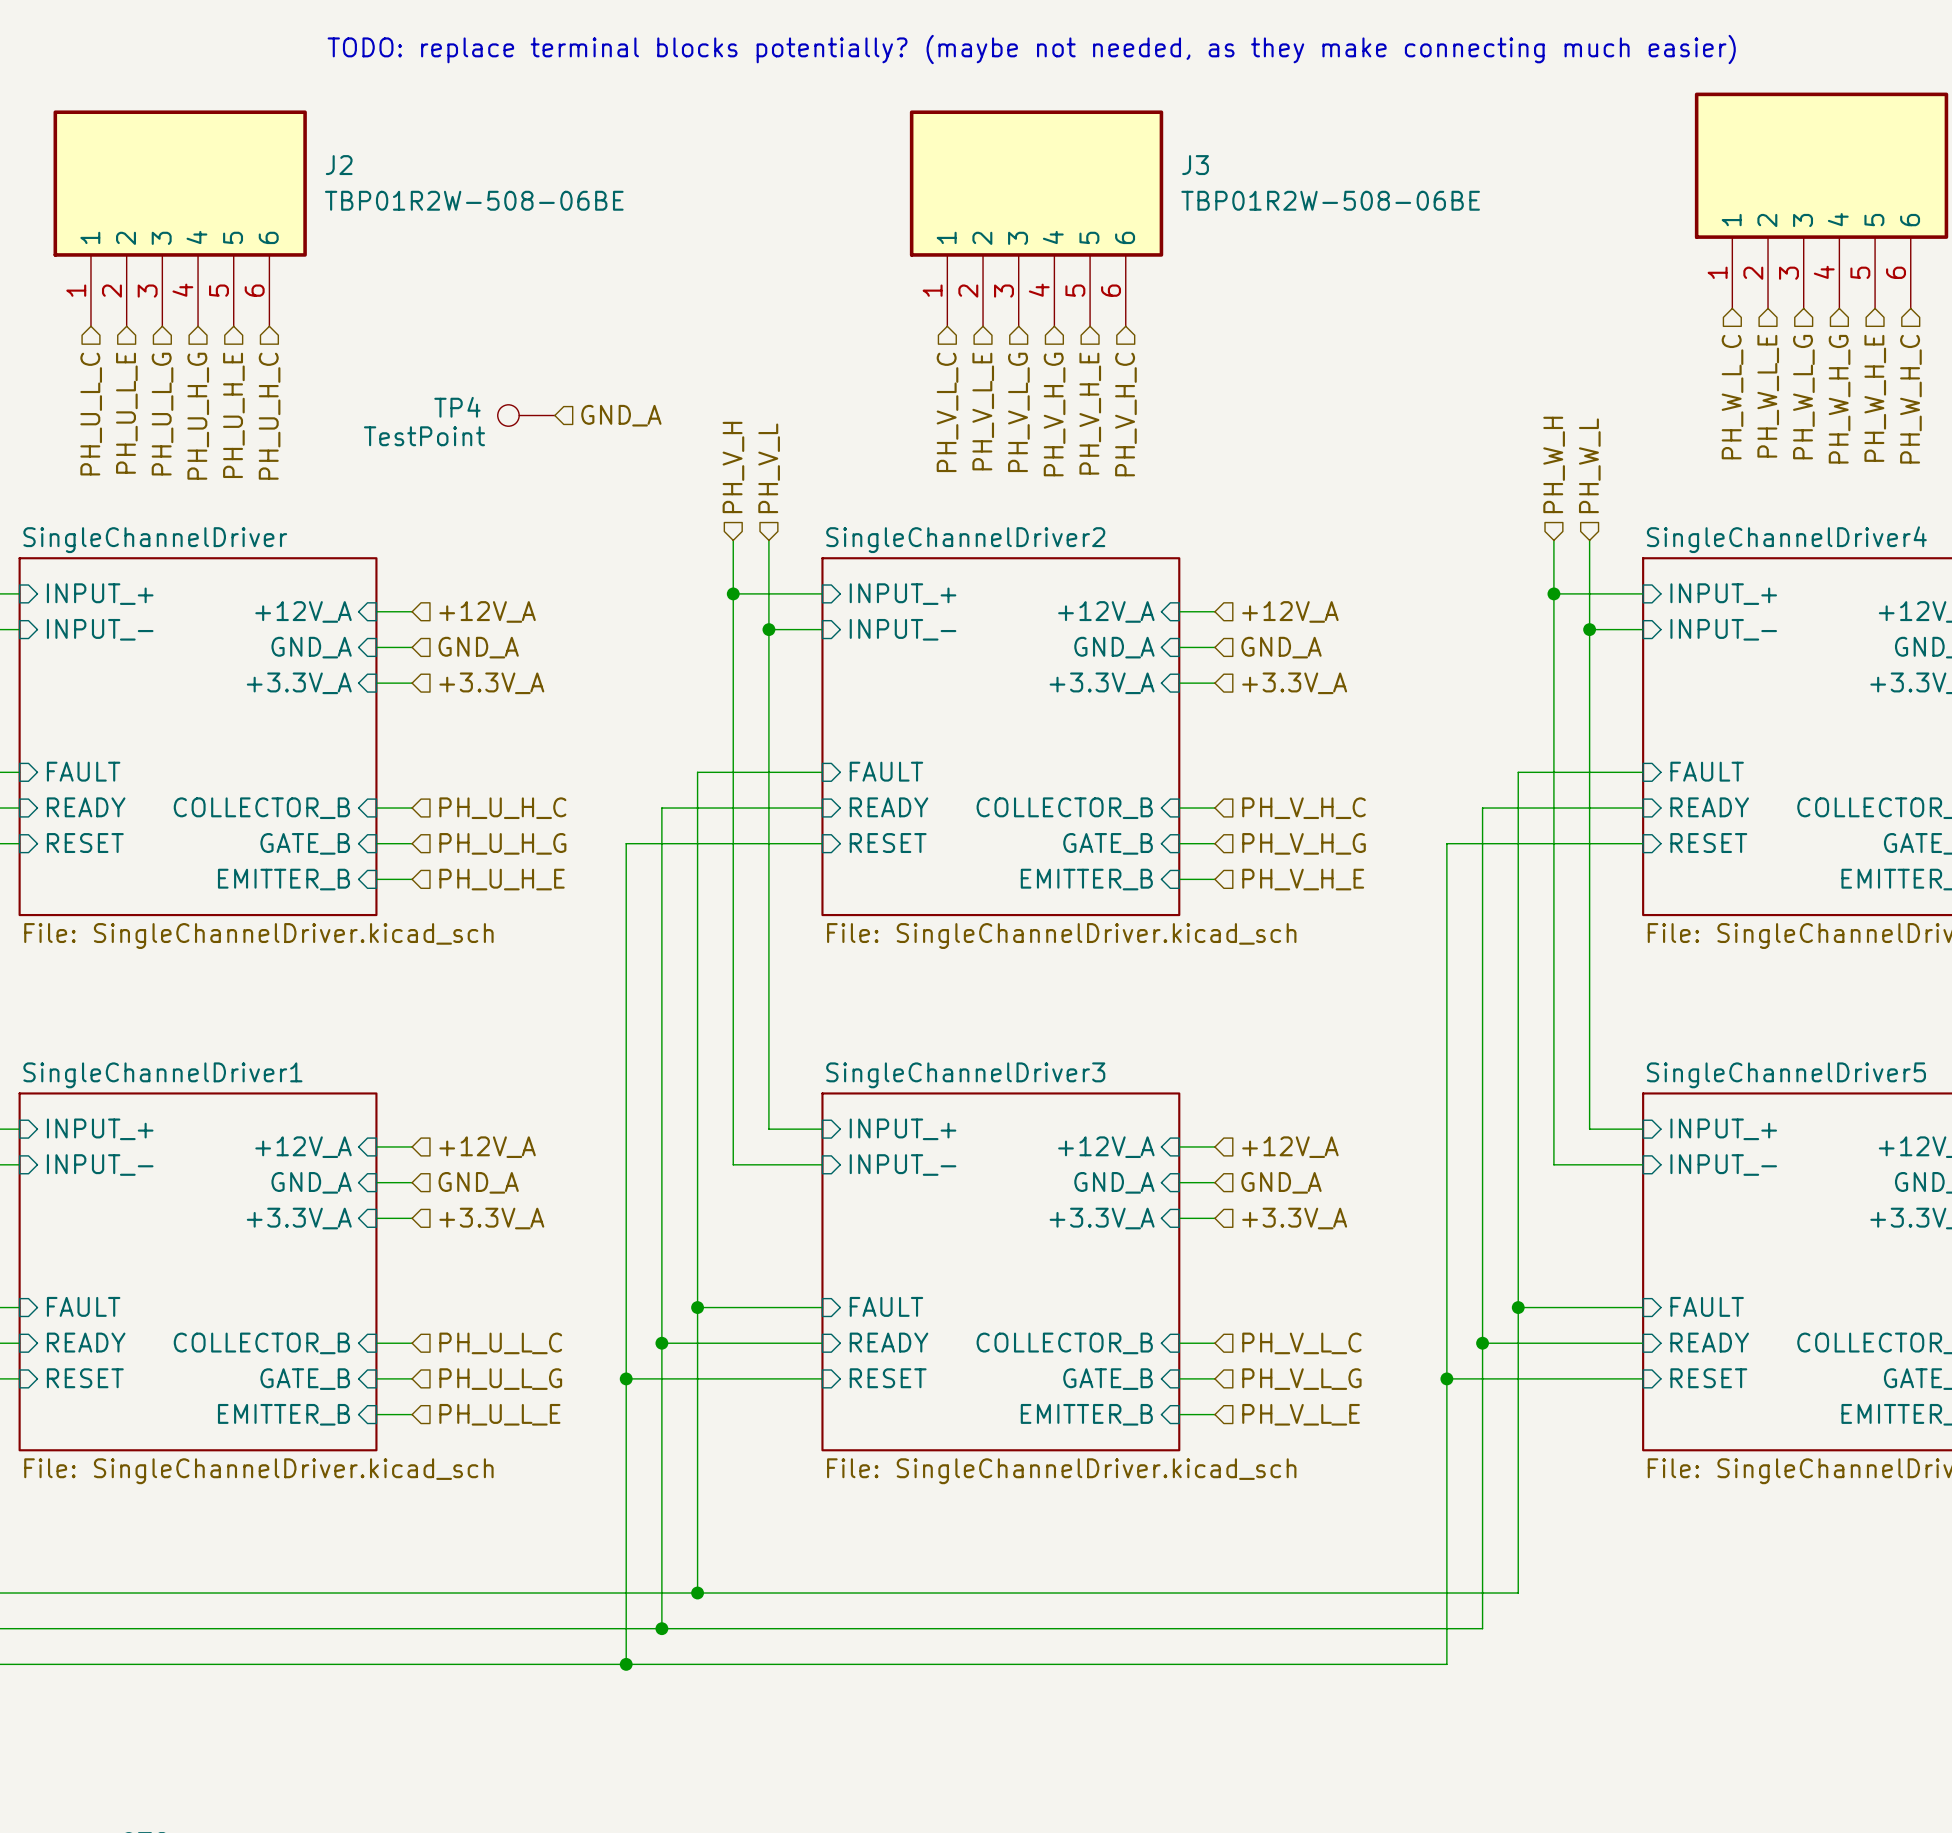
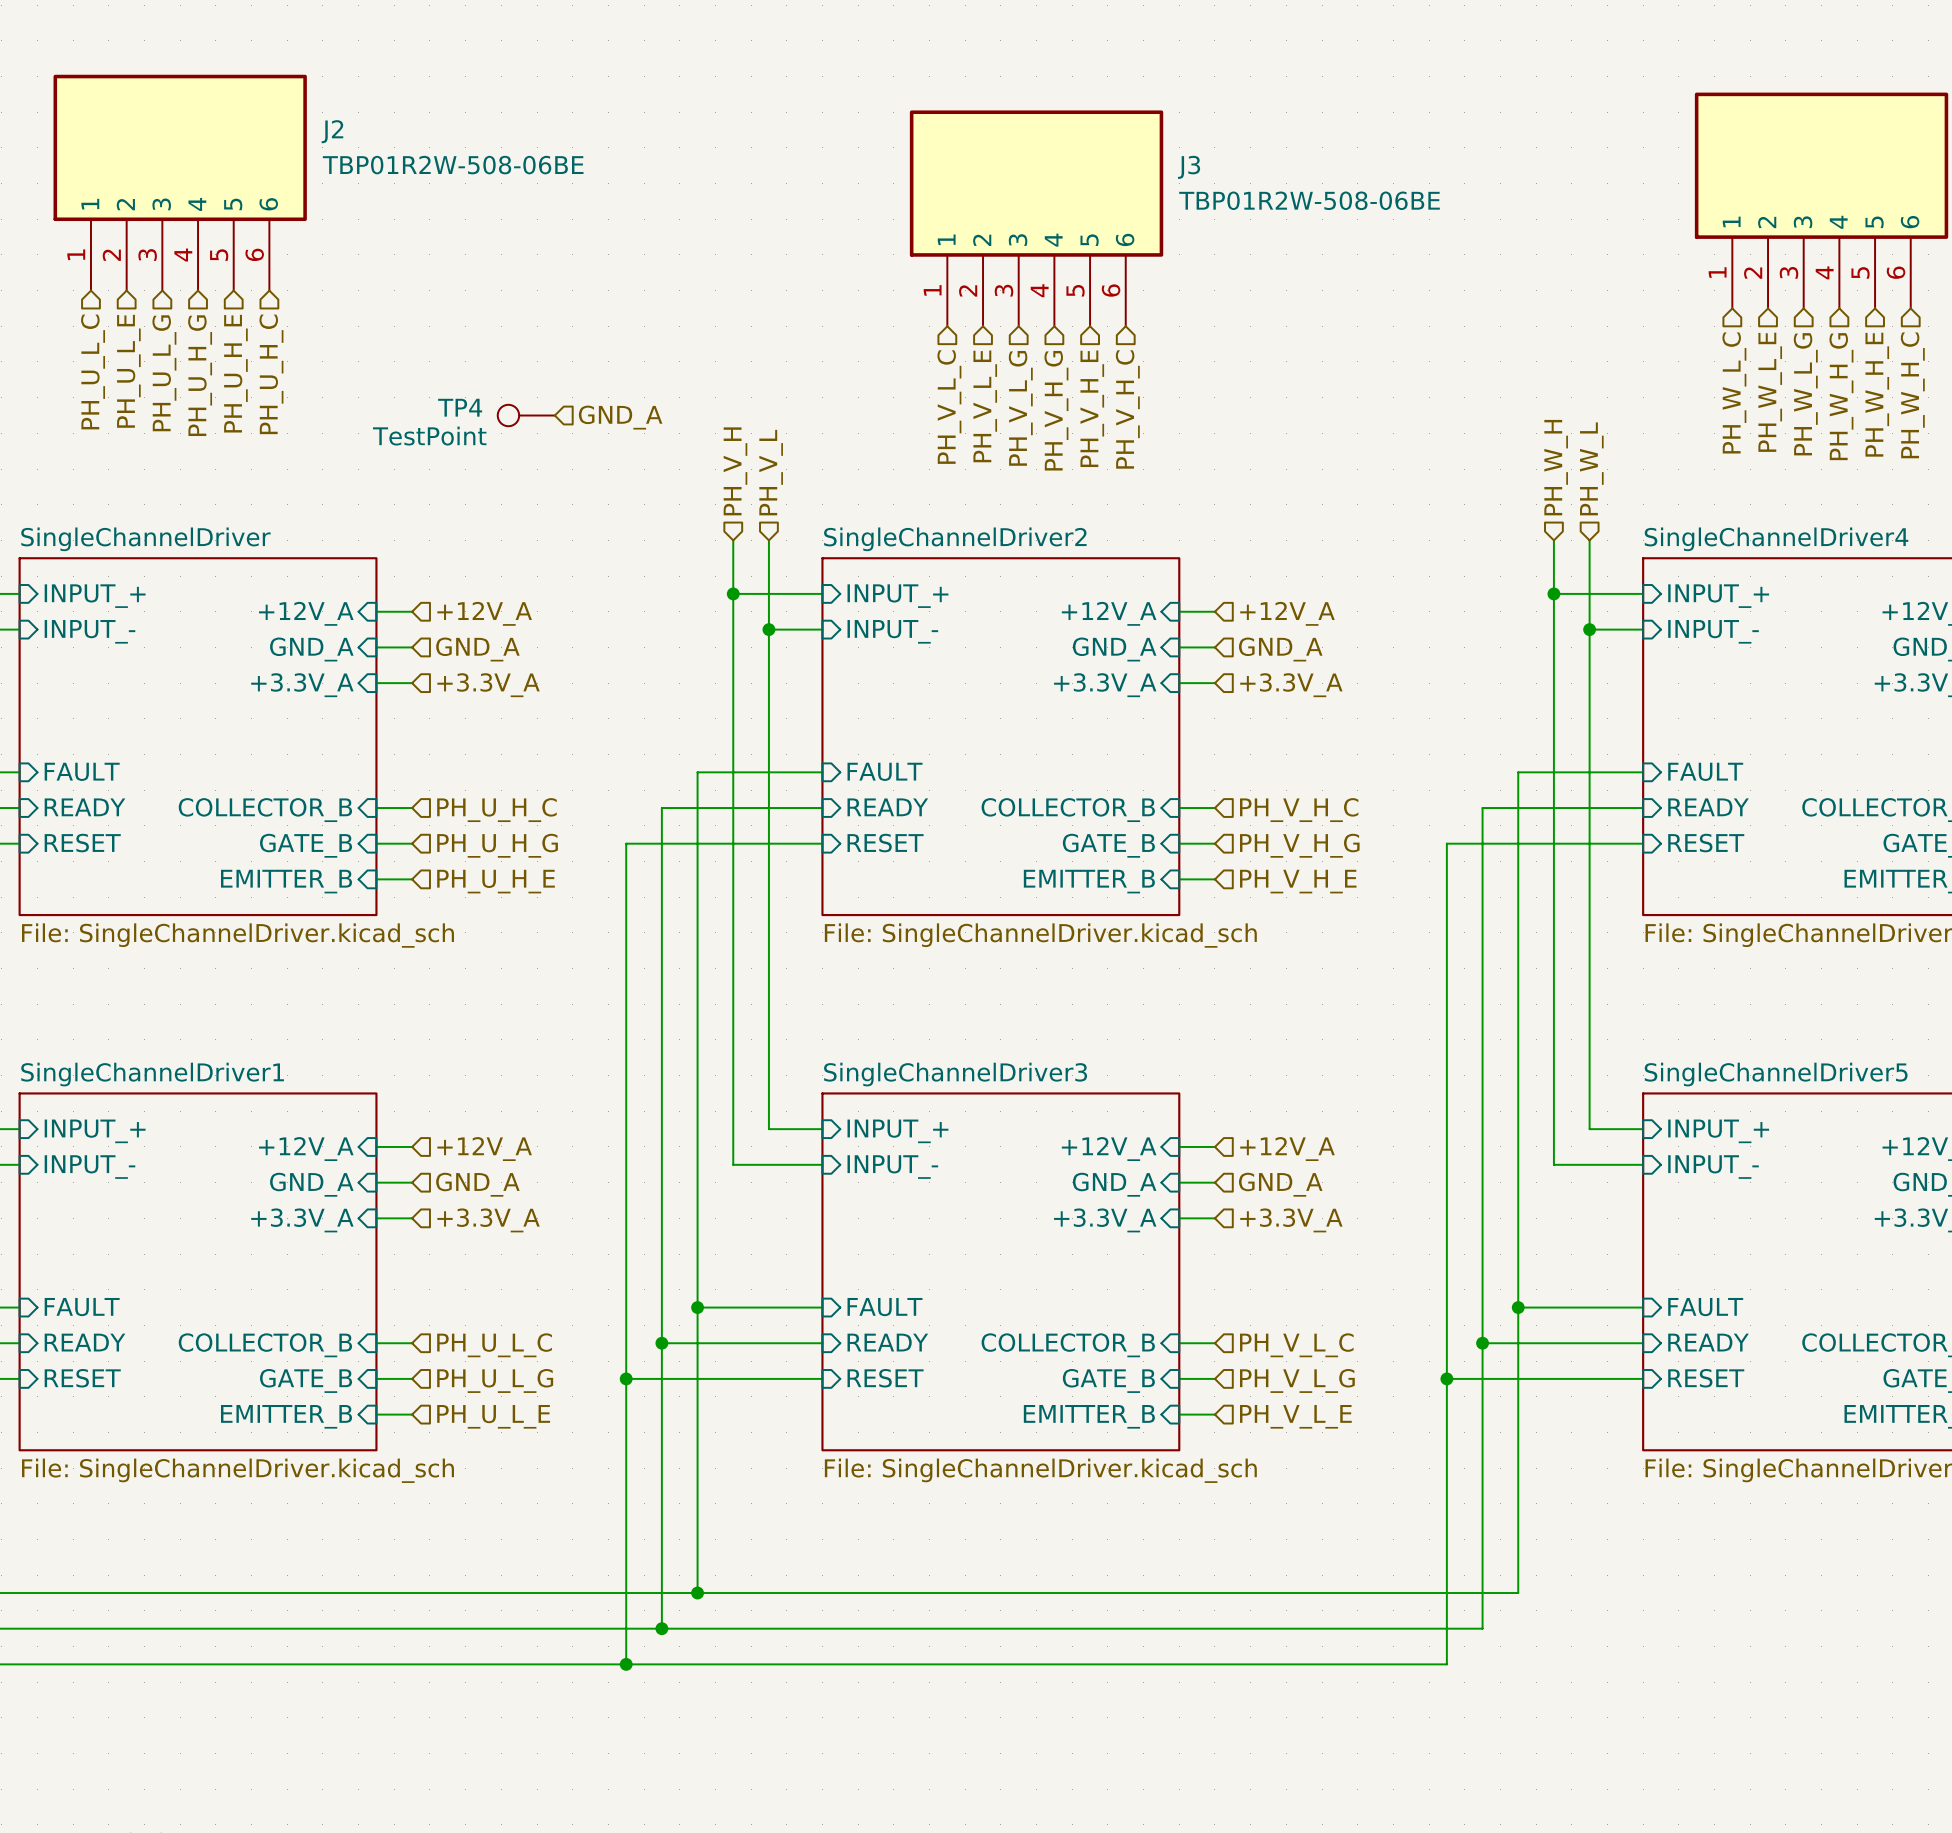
text: TODO: replace terminal blocks potentially? (maybe not needed, as they make connecting much easier) (1031, 49) -> none
J2 position: (180, 218) -> (180, 182)
hierarchical label position: PH_U_L_E (126, 413) -> PH_U_L_E (128, 371)
hierarchical label position: PH_U_L_C (91, 414) -> PH_U_L_C (93, 371)
hierarchical label position: PH_U_L_G (162, 414) -> PH_U_L_G (164, 373)
hierarchical label position: PH_U_H_E (233, 415) -> PH_U_H_E (235, 373)
hierarchical label position: PH_U_H_G (198, 416) -> PH_U_H_G (200, 375)
hierarchical label position: PH_U_H_C (269, 416) -> PH_U_H_C (271, 374)

